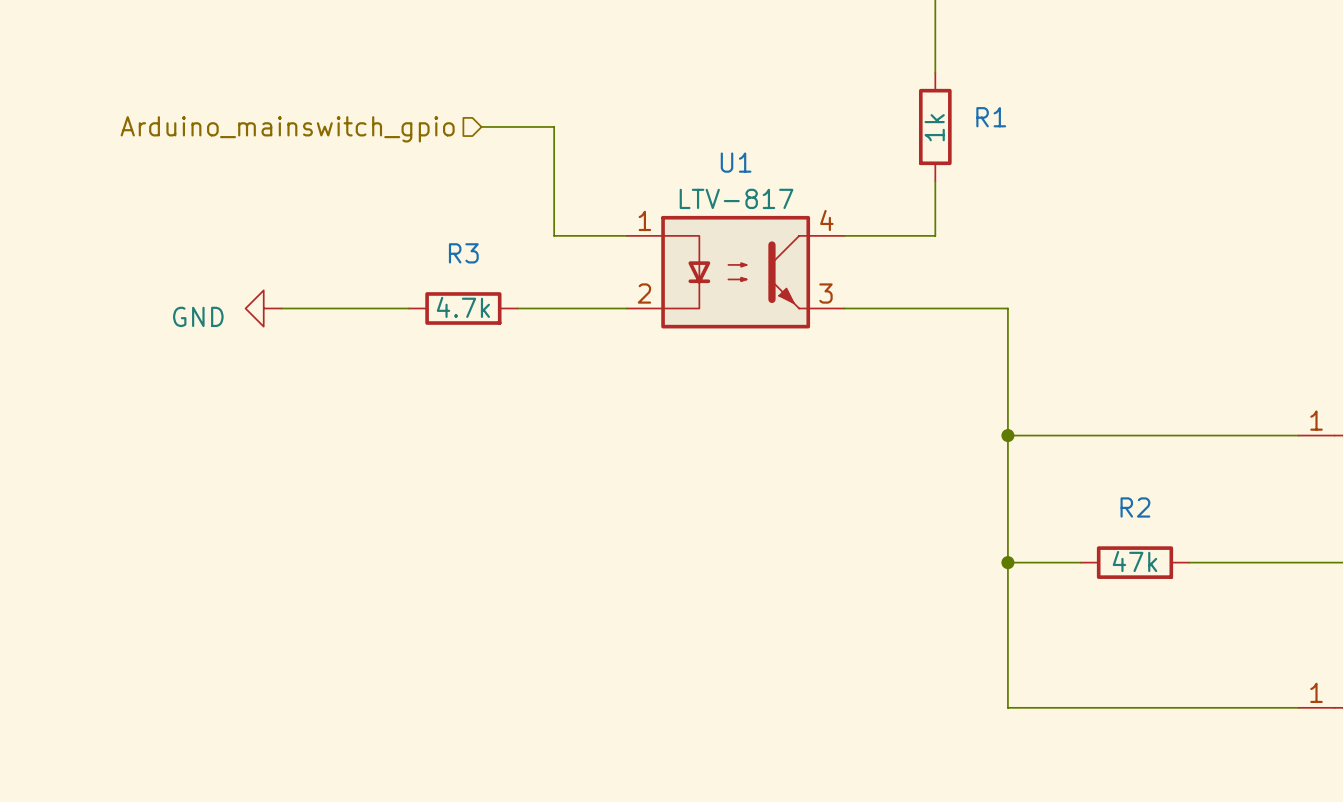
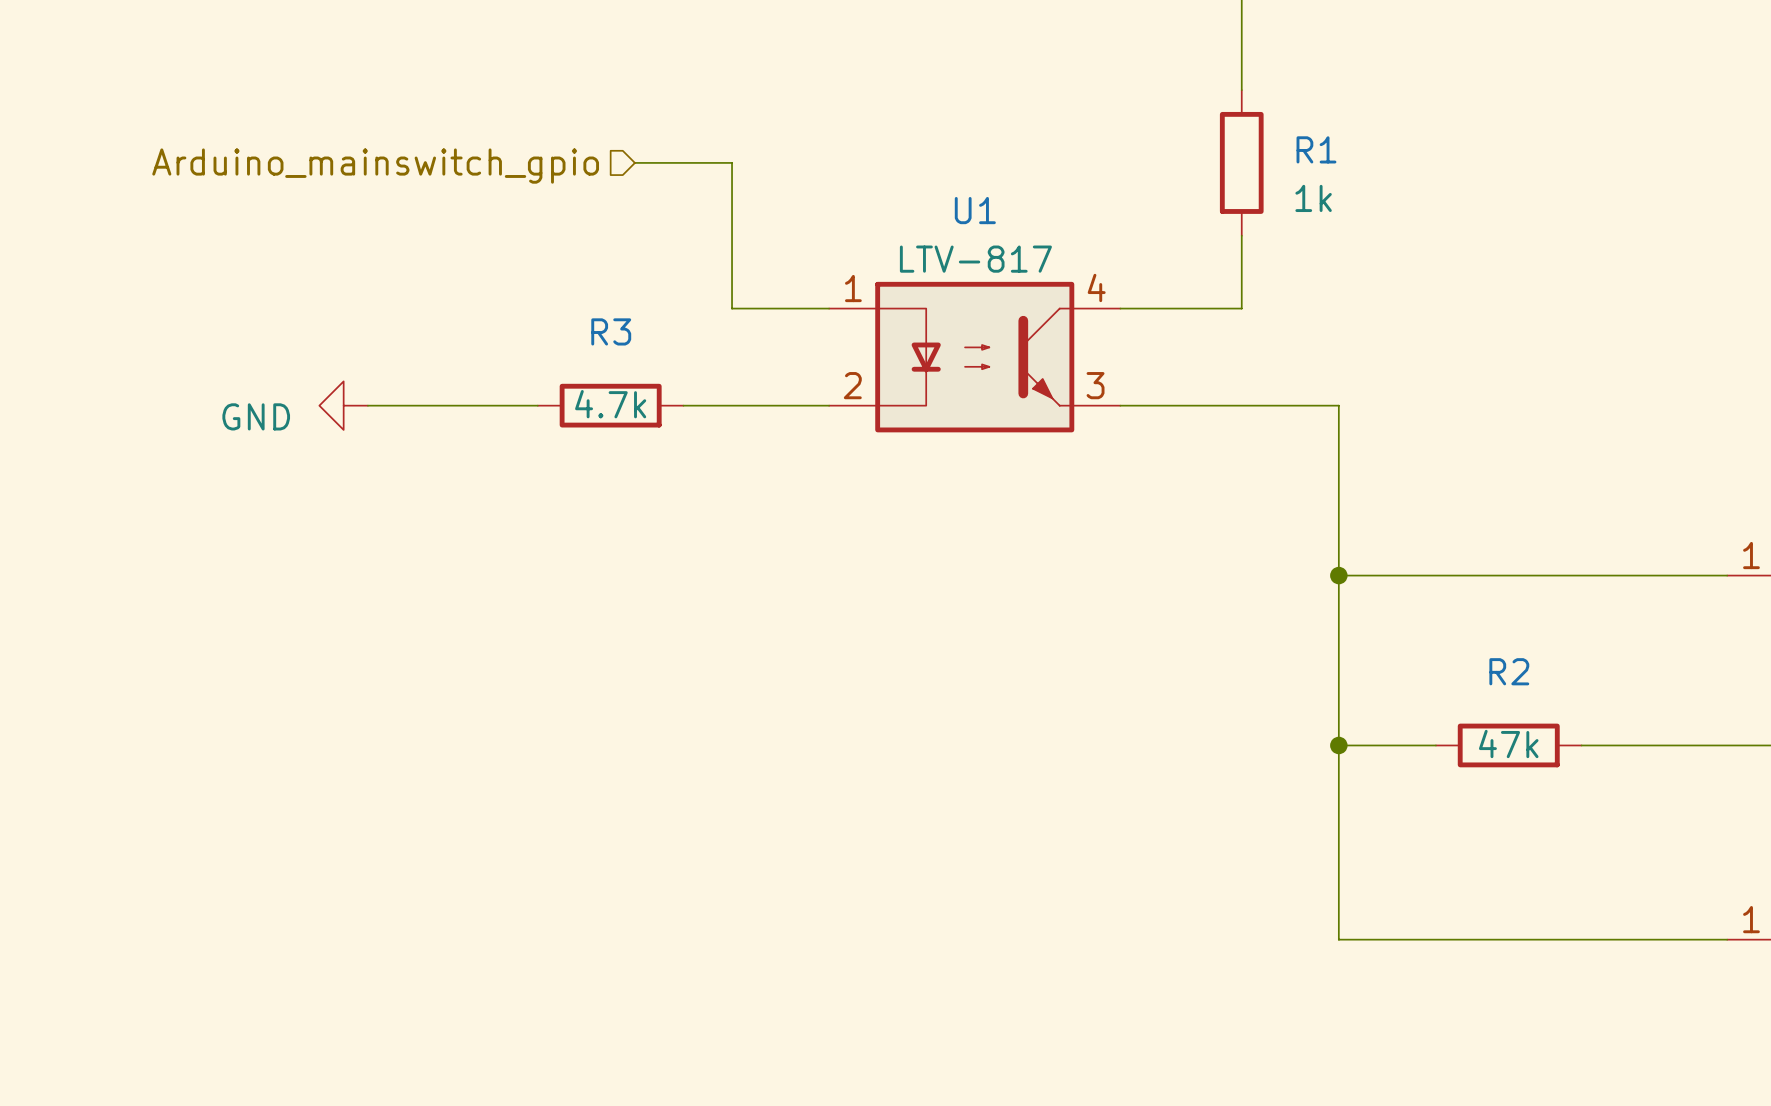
R1 value rotation: 0° (934, 127) -> 90° clockwise (1313, 198)
R1 value position: 1k (934, 127) -> 1k (1313, 198)

